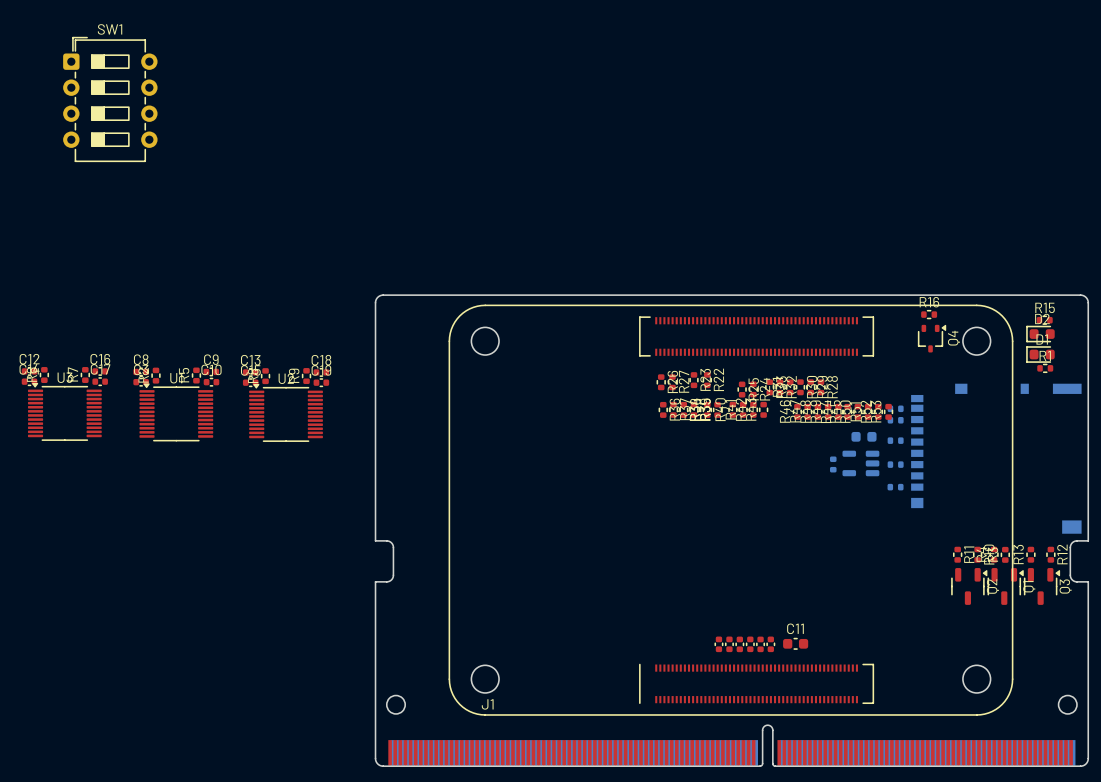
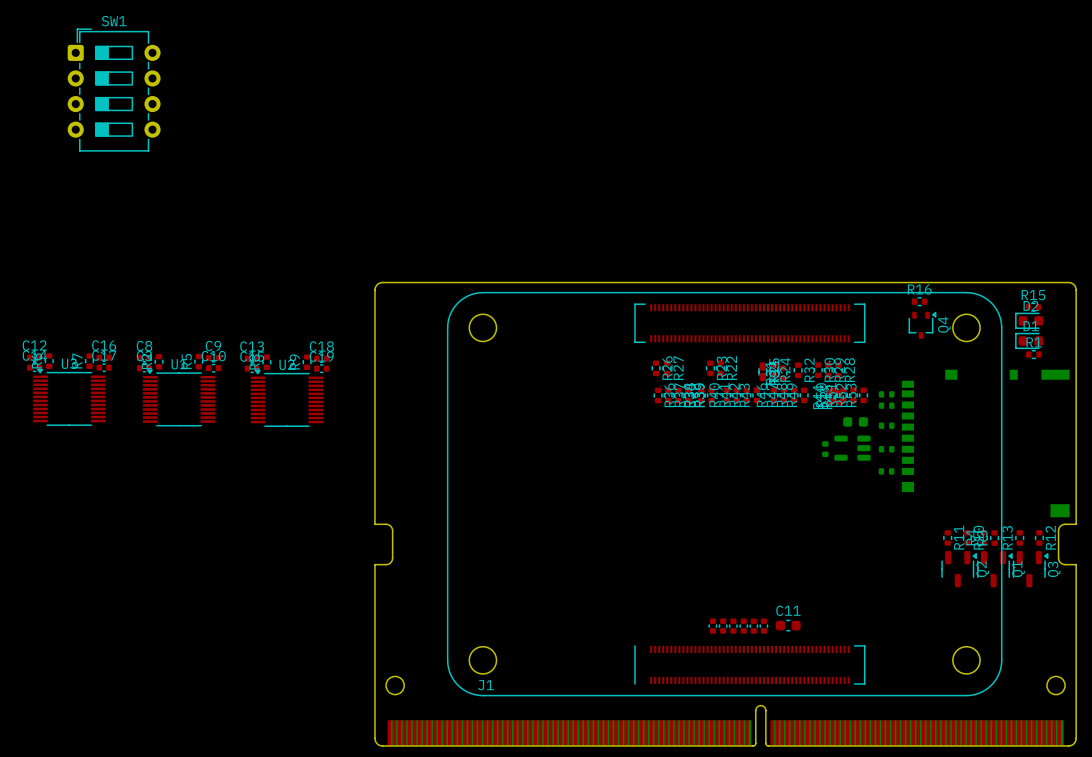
R23 position: (693, 380) -> (710, 368)
R22 position: (707, 380) -> (720, 368)
R32 position: (780, 387) -> (798, 370)
R30 position: (800, 387) -> (818, 370)
R29 position: (810, 387) -> (828, 370)
R28 position: (820, 387) -> (838, 370)
R25 position: (742, 389) -> (762, 370)
R24 position: (753, 389) -> (773, 370)
R46 position: (797, 411) -> (773, 395)
R47 position: (807, 411) -> (784, 395)
R48 position: (817, 411) -> (794, 395)
R49 position: (828, 411) -> (804, 395)
R50 position: (857, 411) -> (833, 395)
R51 position: (868, 411) -> (843, 395)
R52 position: (878, 411) -> (853, 395)
R53 position: (888, 411) -> (863, 395)

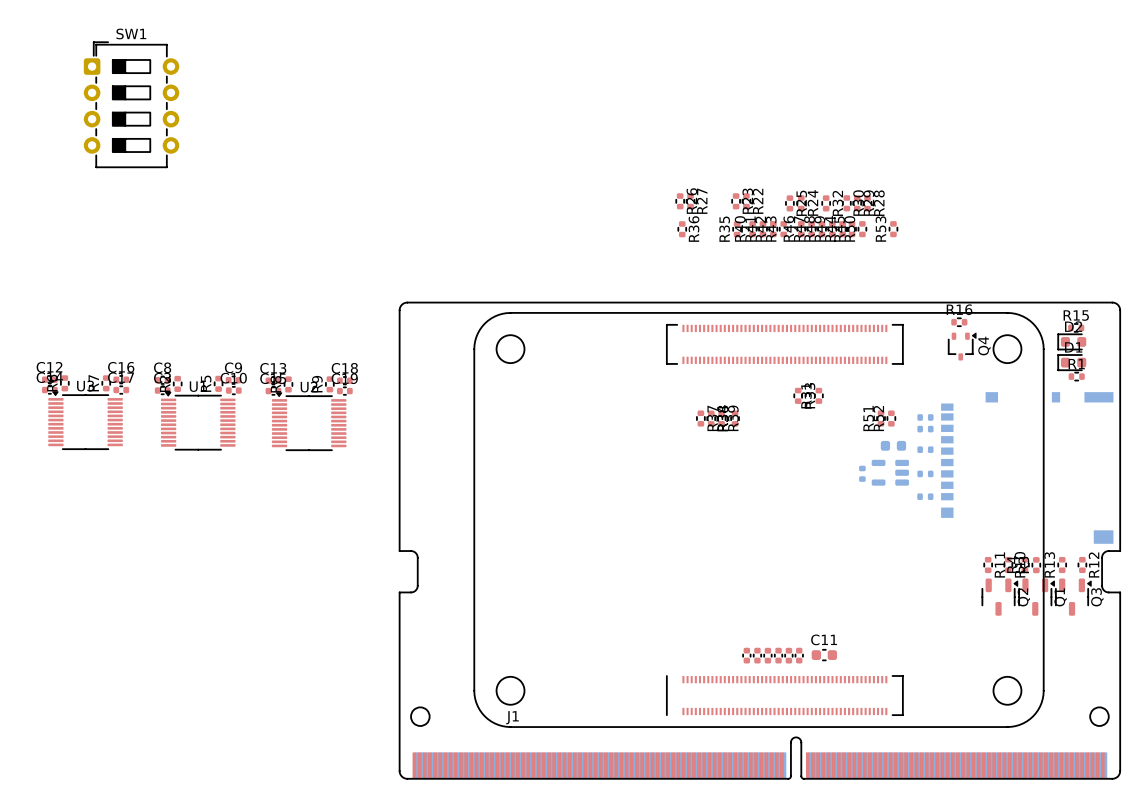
R26 position: (656, 368) -> (680, 201)
R27 position: (667, 368) -> (690, 201)
R23 position: (710, 368) -> (736, 201)
R22 position: (720, 368) -> (746, 201)
R25 position: (762, 370) -> (789, 203)
R24 position: (773, 370) -> (801, 203)
R32 position: (798, 370) -> (826, 203)
R30 position: (818, 370) -> (846, 203)
R29 position: (828, 370) -> (857, 203)
R28 position: (838, 370) -> (867, 203)
R36 position: (658, 395) -> (682, 229)
R35 position: (711, 395) -> (737, 229)
R40 position: (726, 395) -> (752, 229)
R41 position: (736, 395) -> (763, 229)
R42 position: (746, 395) -> (773, 229)
R43 position: (756, 395) -> (783, 229)
R46 position: (773, 395) -> (801, 229)
R47 position: (784, 395) -> (811, 229)
R48 position: (794, 395) -> (822, 229)
R49 position: (804, 395) -> (832, 229)
R50 position: (833, 395) -> (862, 229)
R53 position: (863, 395) -> (893, 229)
R44 position: (830, 397) -> (842, 229)
R45 position: (839, 397) -> (852, 229)

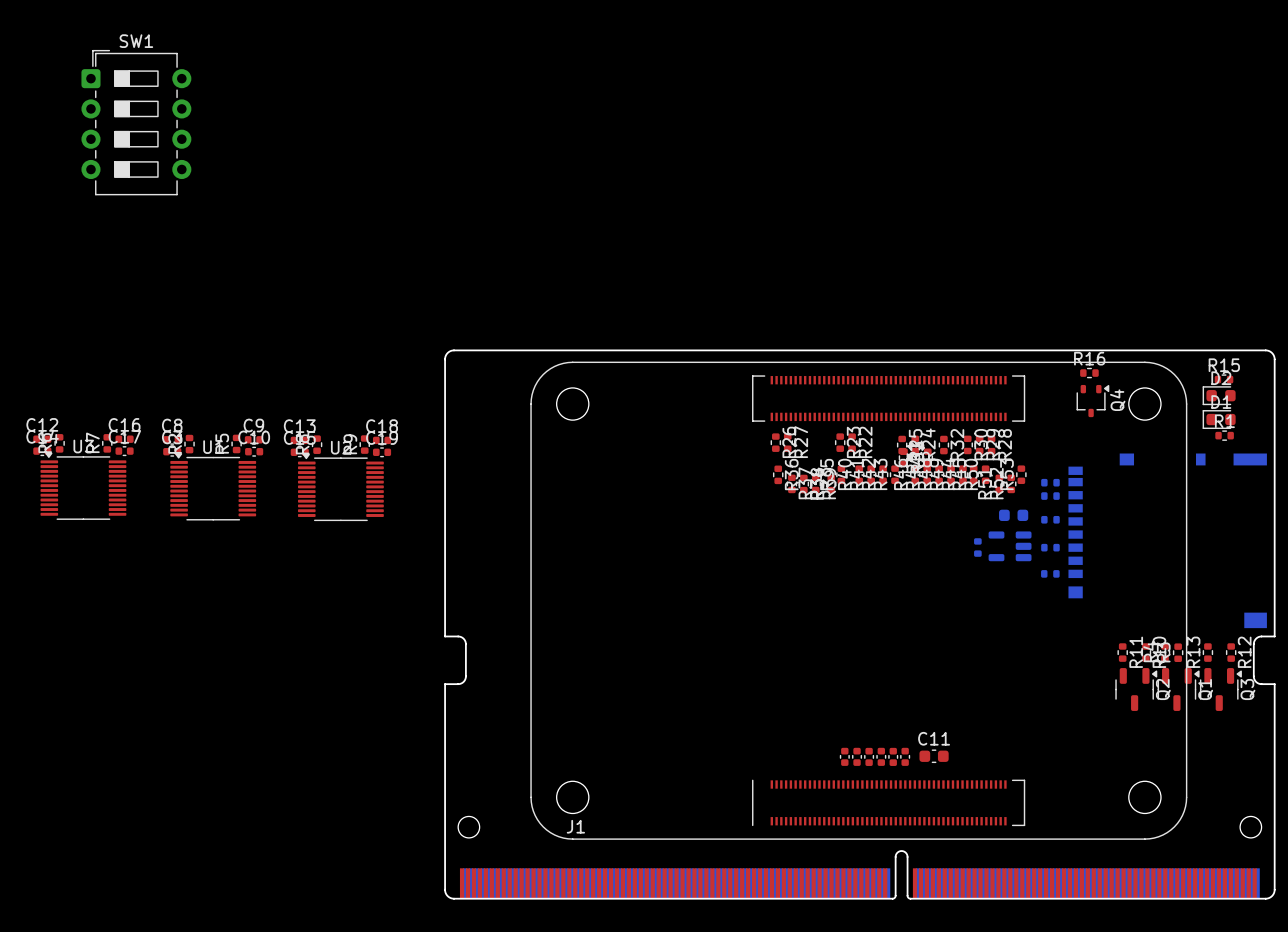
R26 position: (680, 201) -> (775, 442)
R27 position: (690, 201) -> (787, 442)
R23 position: (736, 201) -> (840, 442)
R22 position: (746, 201) -> (852, 442)
R25 position: (789, 203) -> (902, 445)
R24 position: (801, 203) -> (915, 444)
R32 position: (826, 203) -> (943, 445)
R30 position: (846, 203) -> (967, 444)
R29 position: (857, 203) -> (979, 444)
R28 position: (867, 203) -> (991, 445)
R36 position: (682, 229) -> (778, 474)
R35 position: (737, 229) -> (841, 474)
R40 position: (752, 229) -> (859, 474)
R41 position: (763, 229) -> (871, 474)
R42 position: (773, 229) -> (883, 474)
R43 position: (783, 229) -> (895, 474)
R46 position: (801, 229) -> (915, 474)
R47 position: (811, 229) -> (927, 474)
R48 position: (822, 229) -> (939, 474)
R49 position: (832, 229) -> (951, 474)
R44 position: (842, 229) -> (962, 474)
R45 position: (852, 229) -> (973, 474)
R50 position: (862, 229) -> (985, 474)
R53 position: (893, 229) -> (1021, 474)

